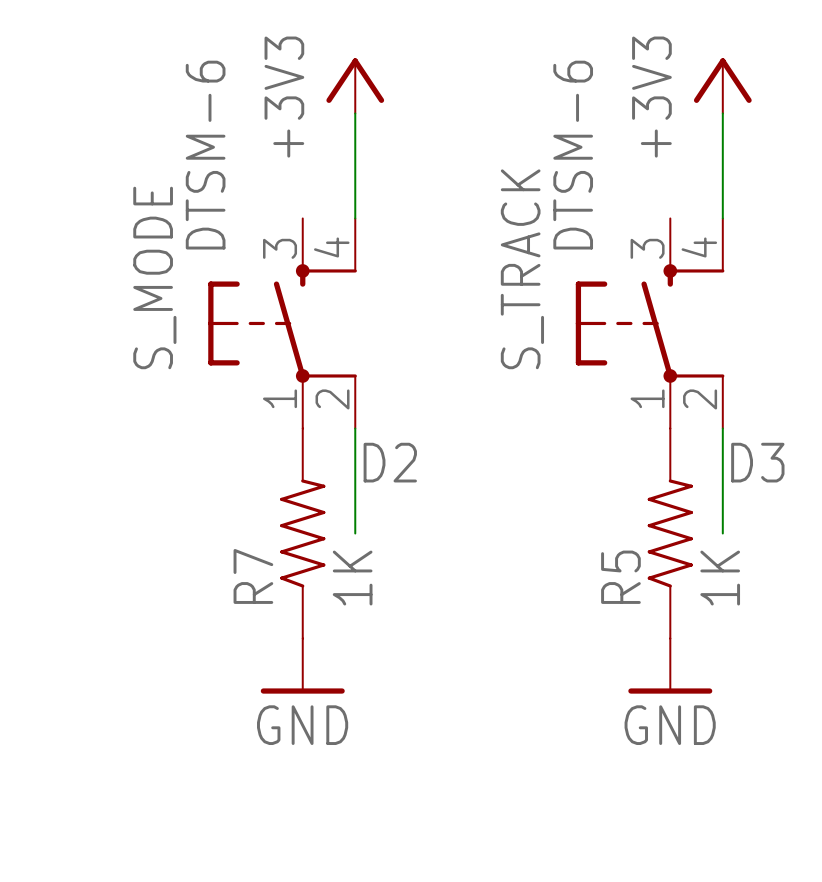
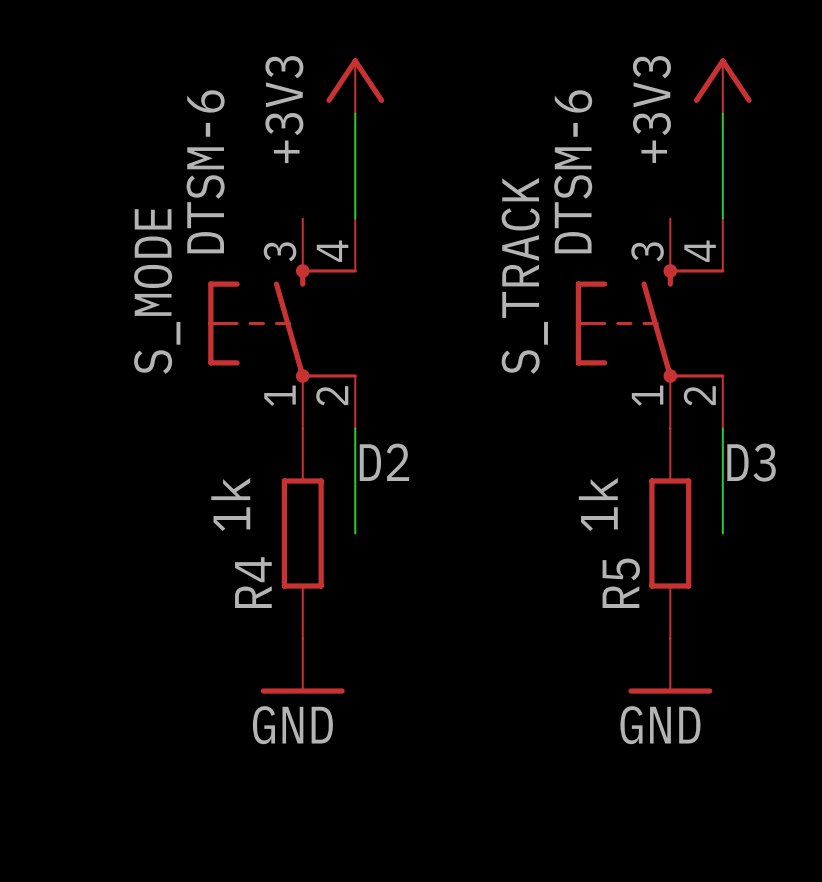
R5 symbol: [647, 428, 693, 639] -> [649, 428, 692, 639]
R5 text: none -> 1k (598, 504)
R7: 1K (302, 533) -> none
R4: none -> (302, 533)
R5 value: 1K (720, 578) -> none

